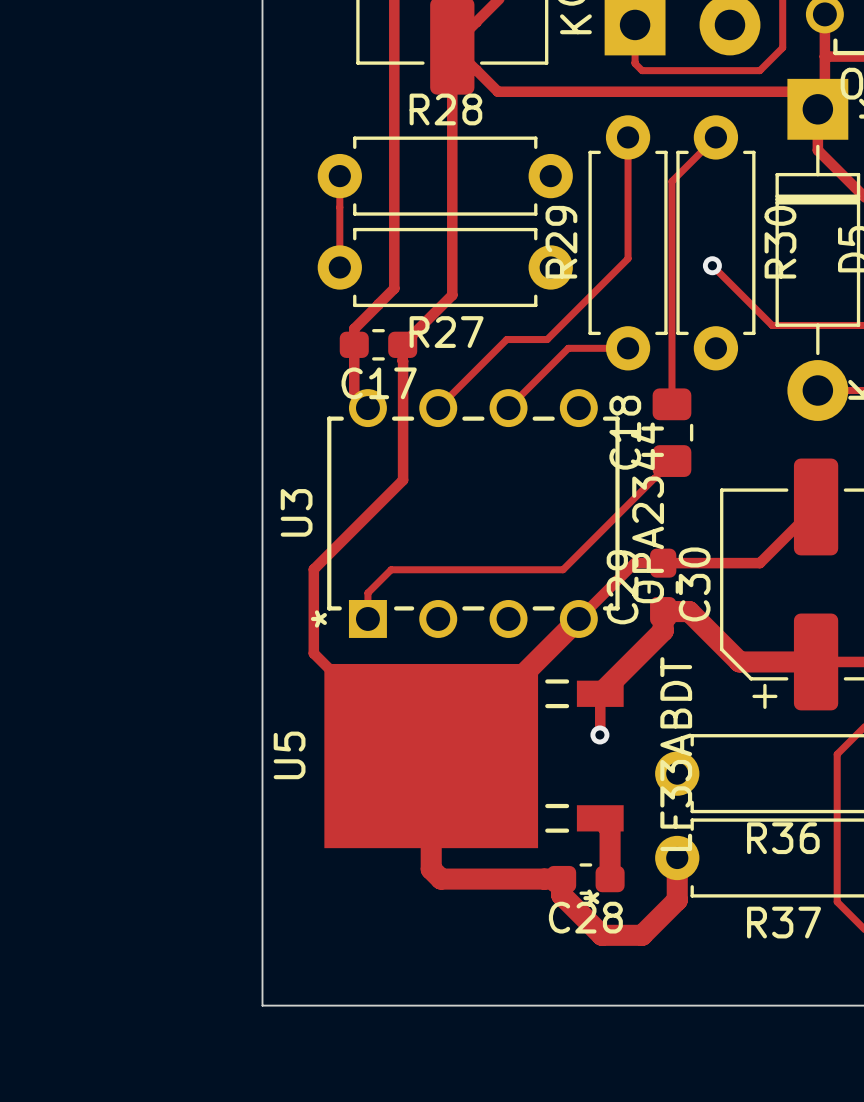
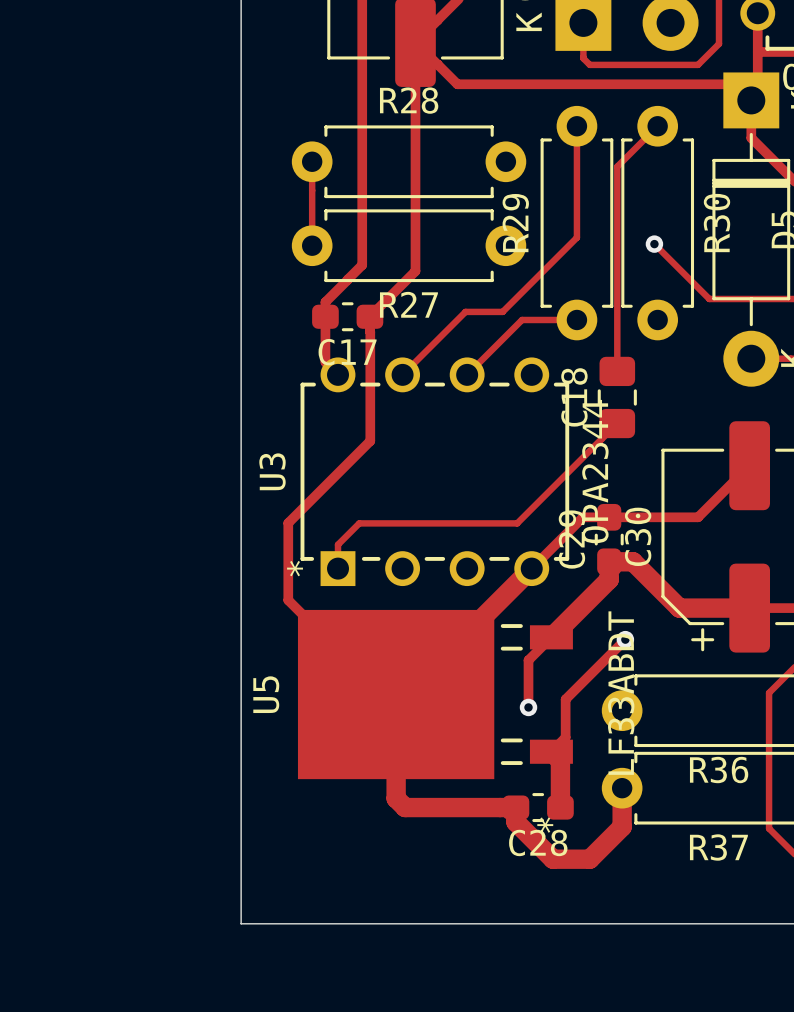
track: (600, 693) (600, 734) -> (551, 637) (528, 660) (528, 707)
track: none -> (625, 639) (565, 699) (565, 737) (551, 751)
via: none -> (625, 639)
via position: (599, 734) -> (528, 707)

